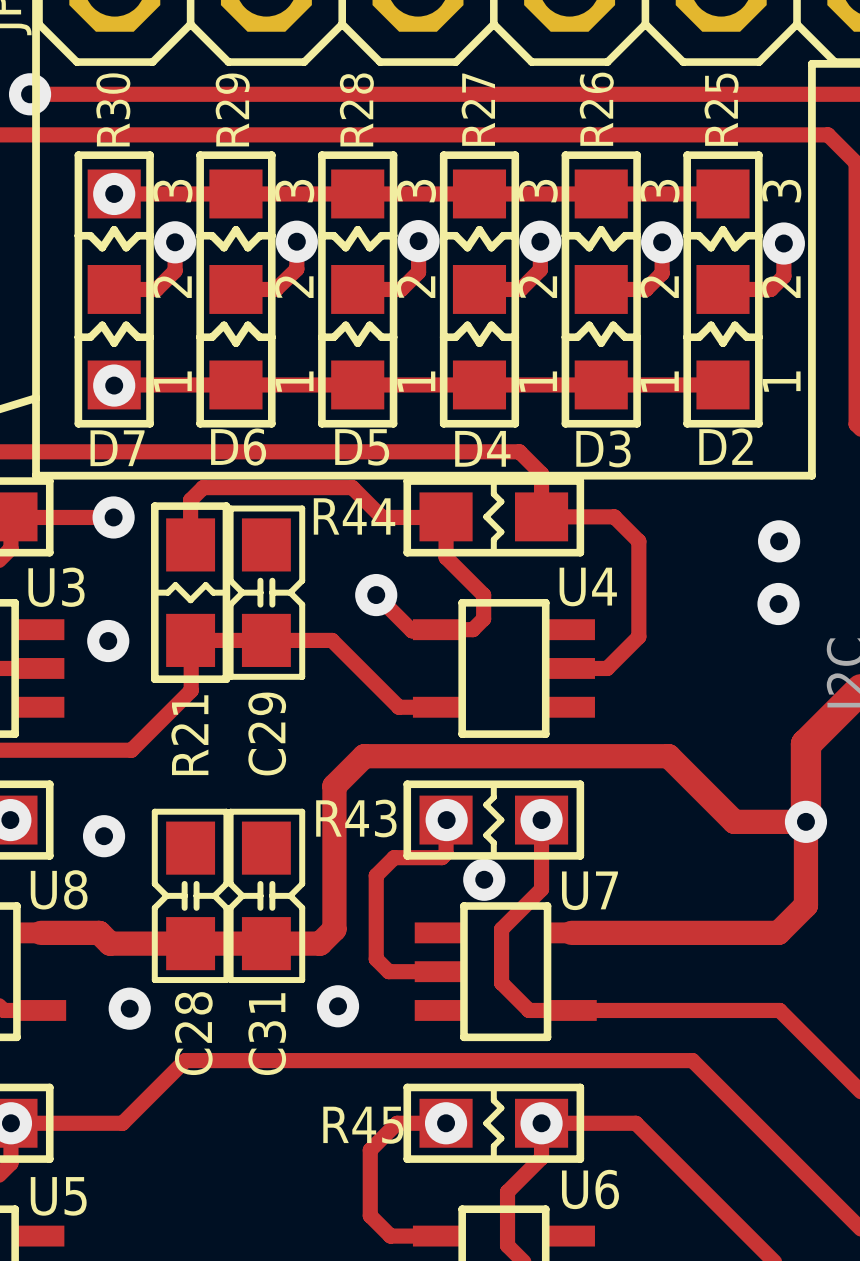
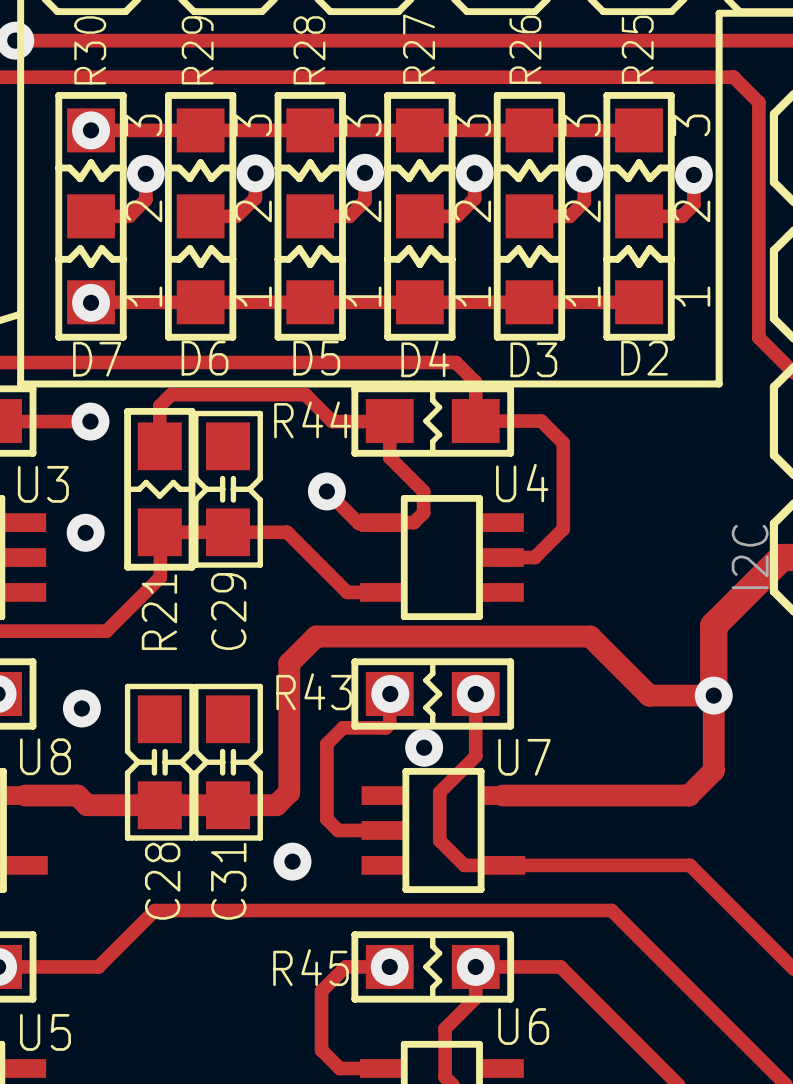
via: (779, 541) -> none
via: (778, 604) -> none
via: (129, 1008) -> none

